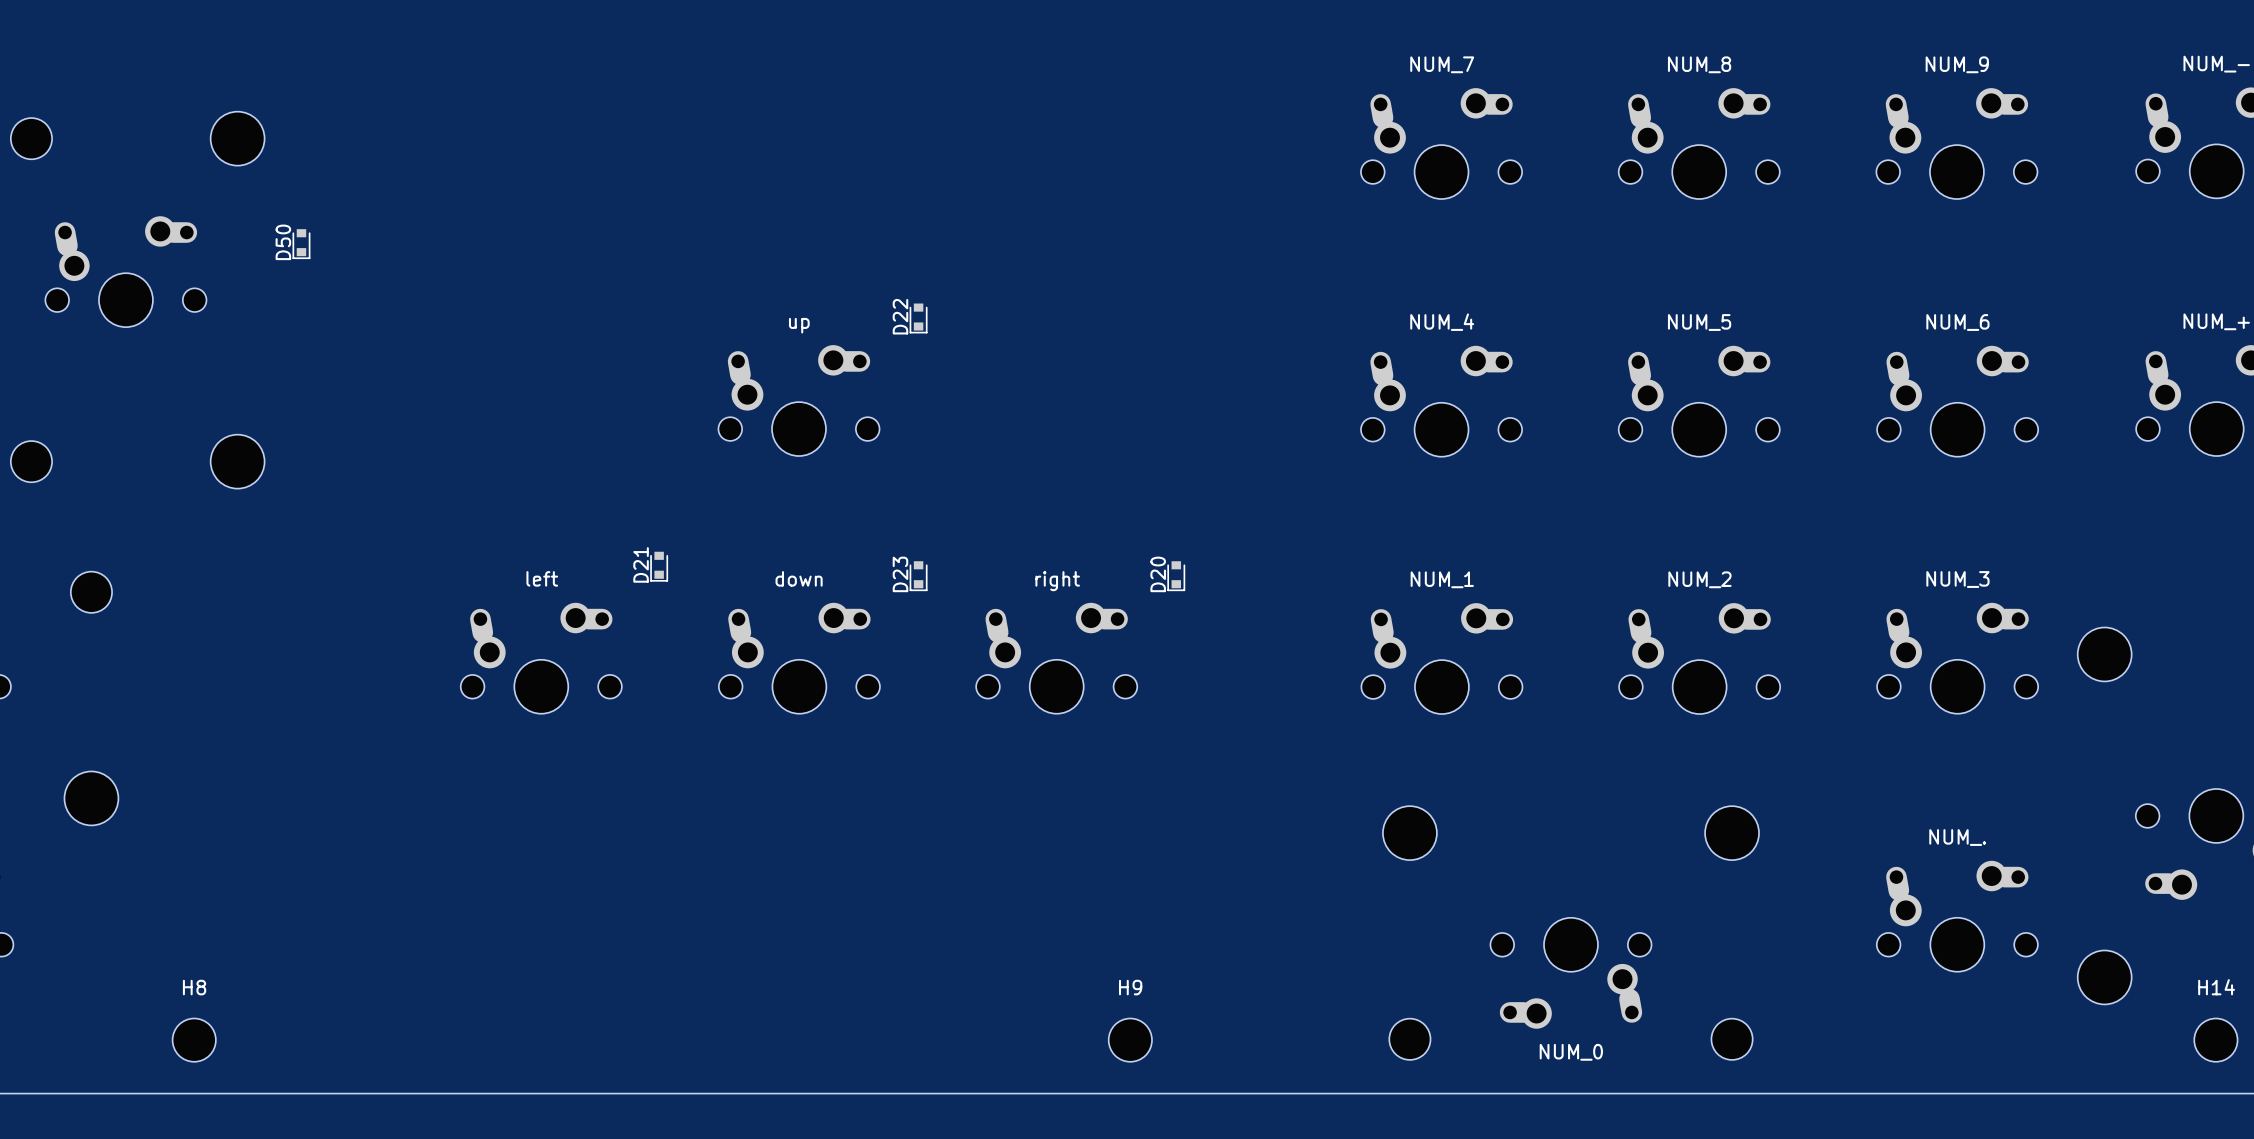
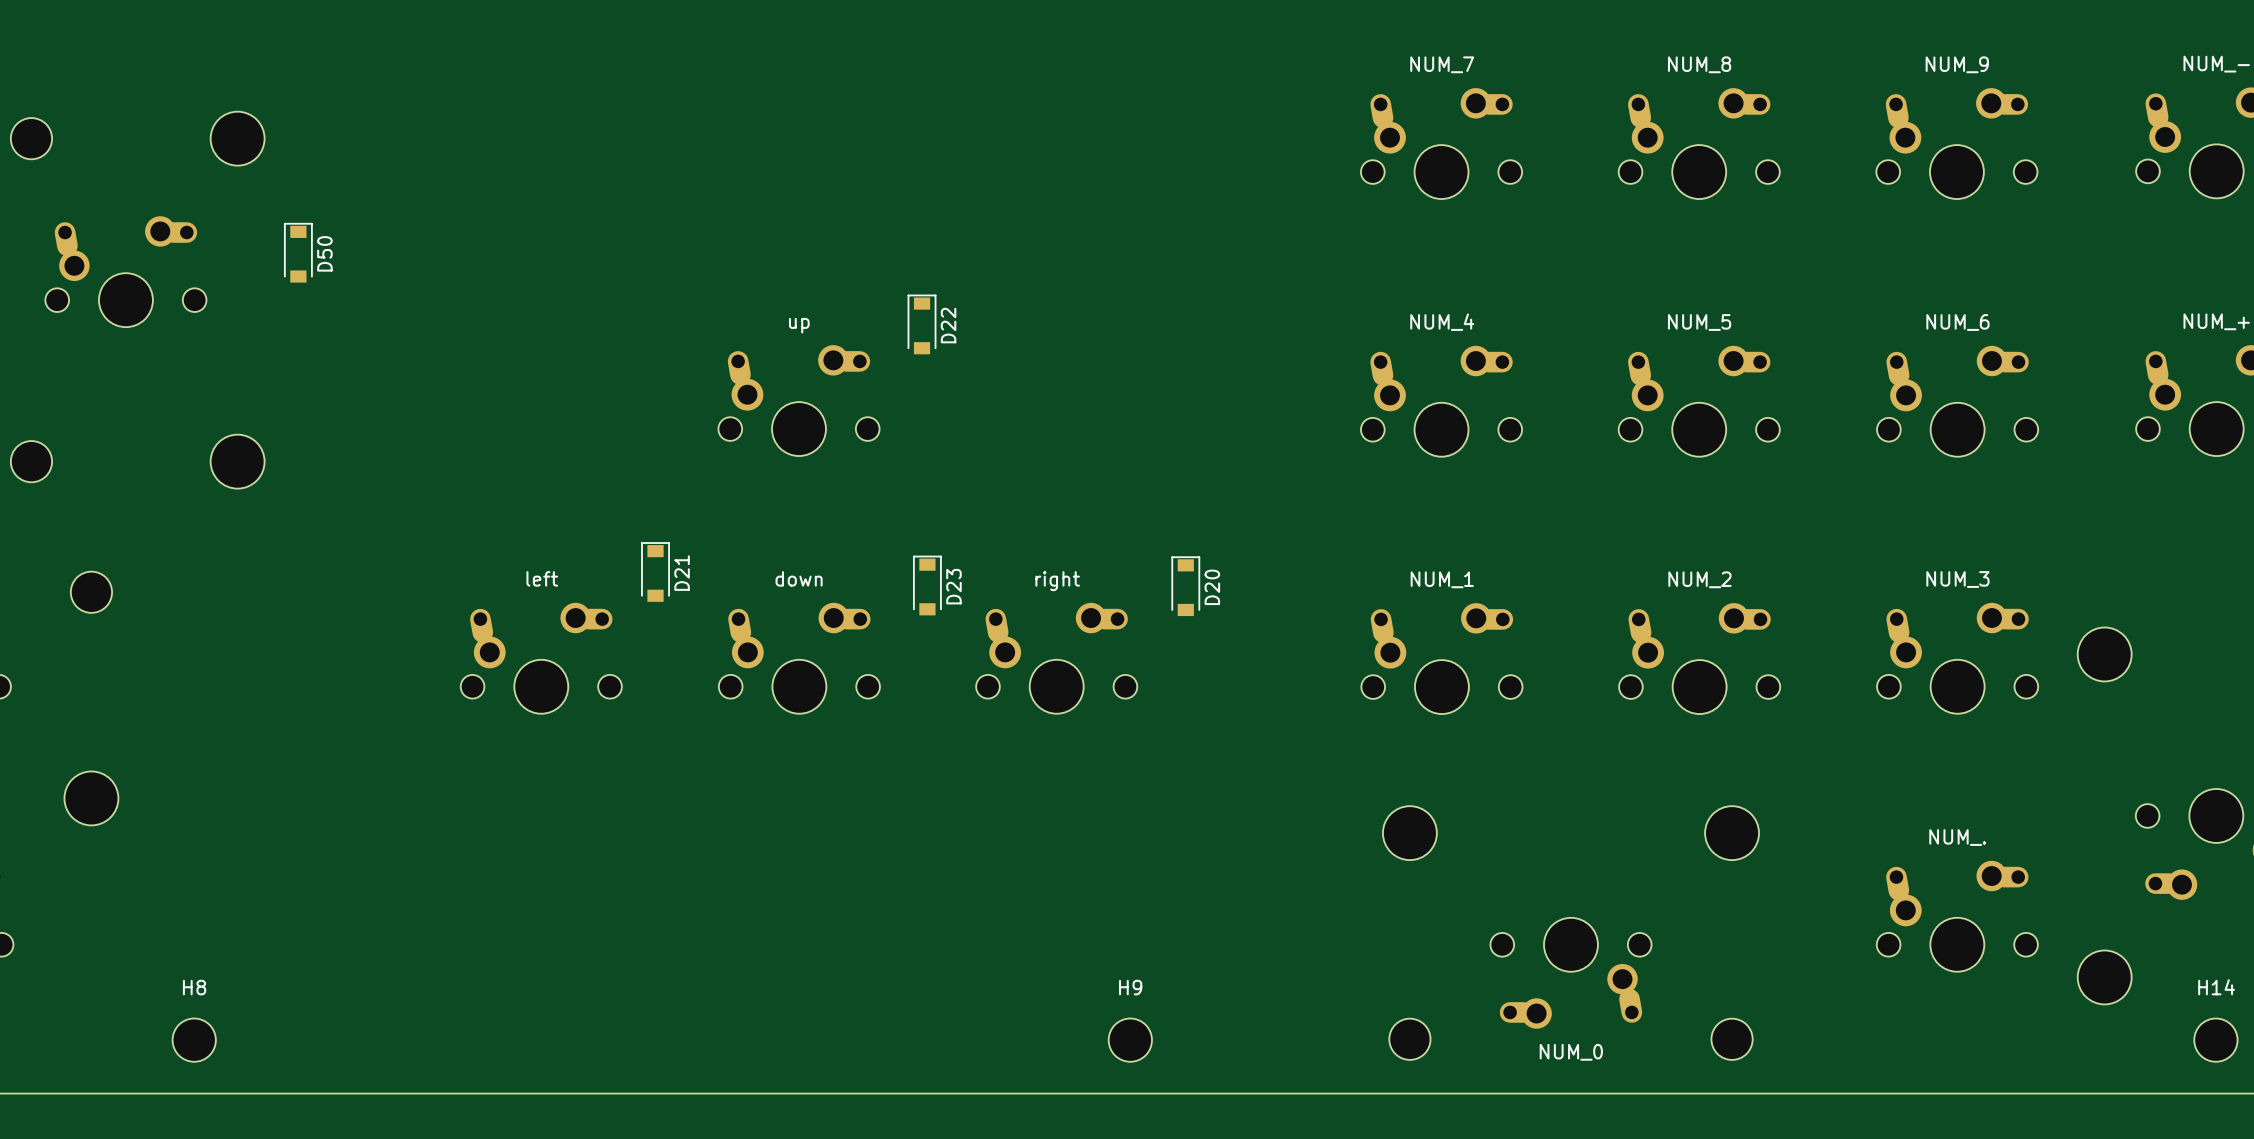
D50 footprint: [292, 229, 311, 260] -> [284, 222, 313, 283]
D50 name position: D50 (283, 242) -> D50 (324, 253)
D22 footprint: [909, 303, 928, 334] -> [907, 294, 937, 355]
D22 name position: D22 (900, 316) -> D22 (948, 325)
D21 footprint: [650, 551, 669, 582] -> [641, 542, 670, 602]
D23 footprint: [909, 561, 928, 592] -> [913, 555, 942, 616]
D20 footprint: [1167, 561, 1186, 592] -> [1171, 556, 1201, 617]
D21 name position: D21 (641, 564) -> D21 (682, 573)
D23 name position: D23 (900, 574) -> D23 (953, 586)
D20 name position: D20 (1158, 574) -> D20 (1212, 587)

